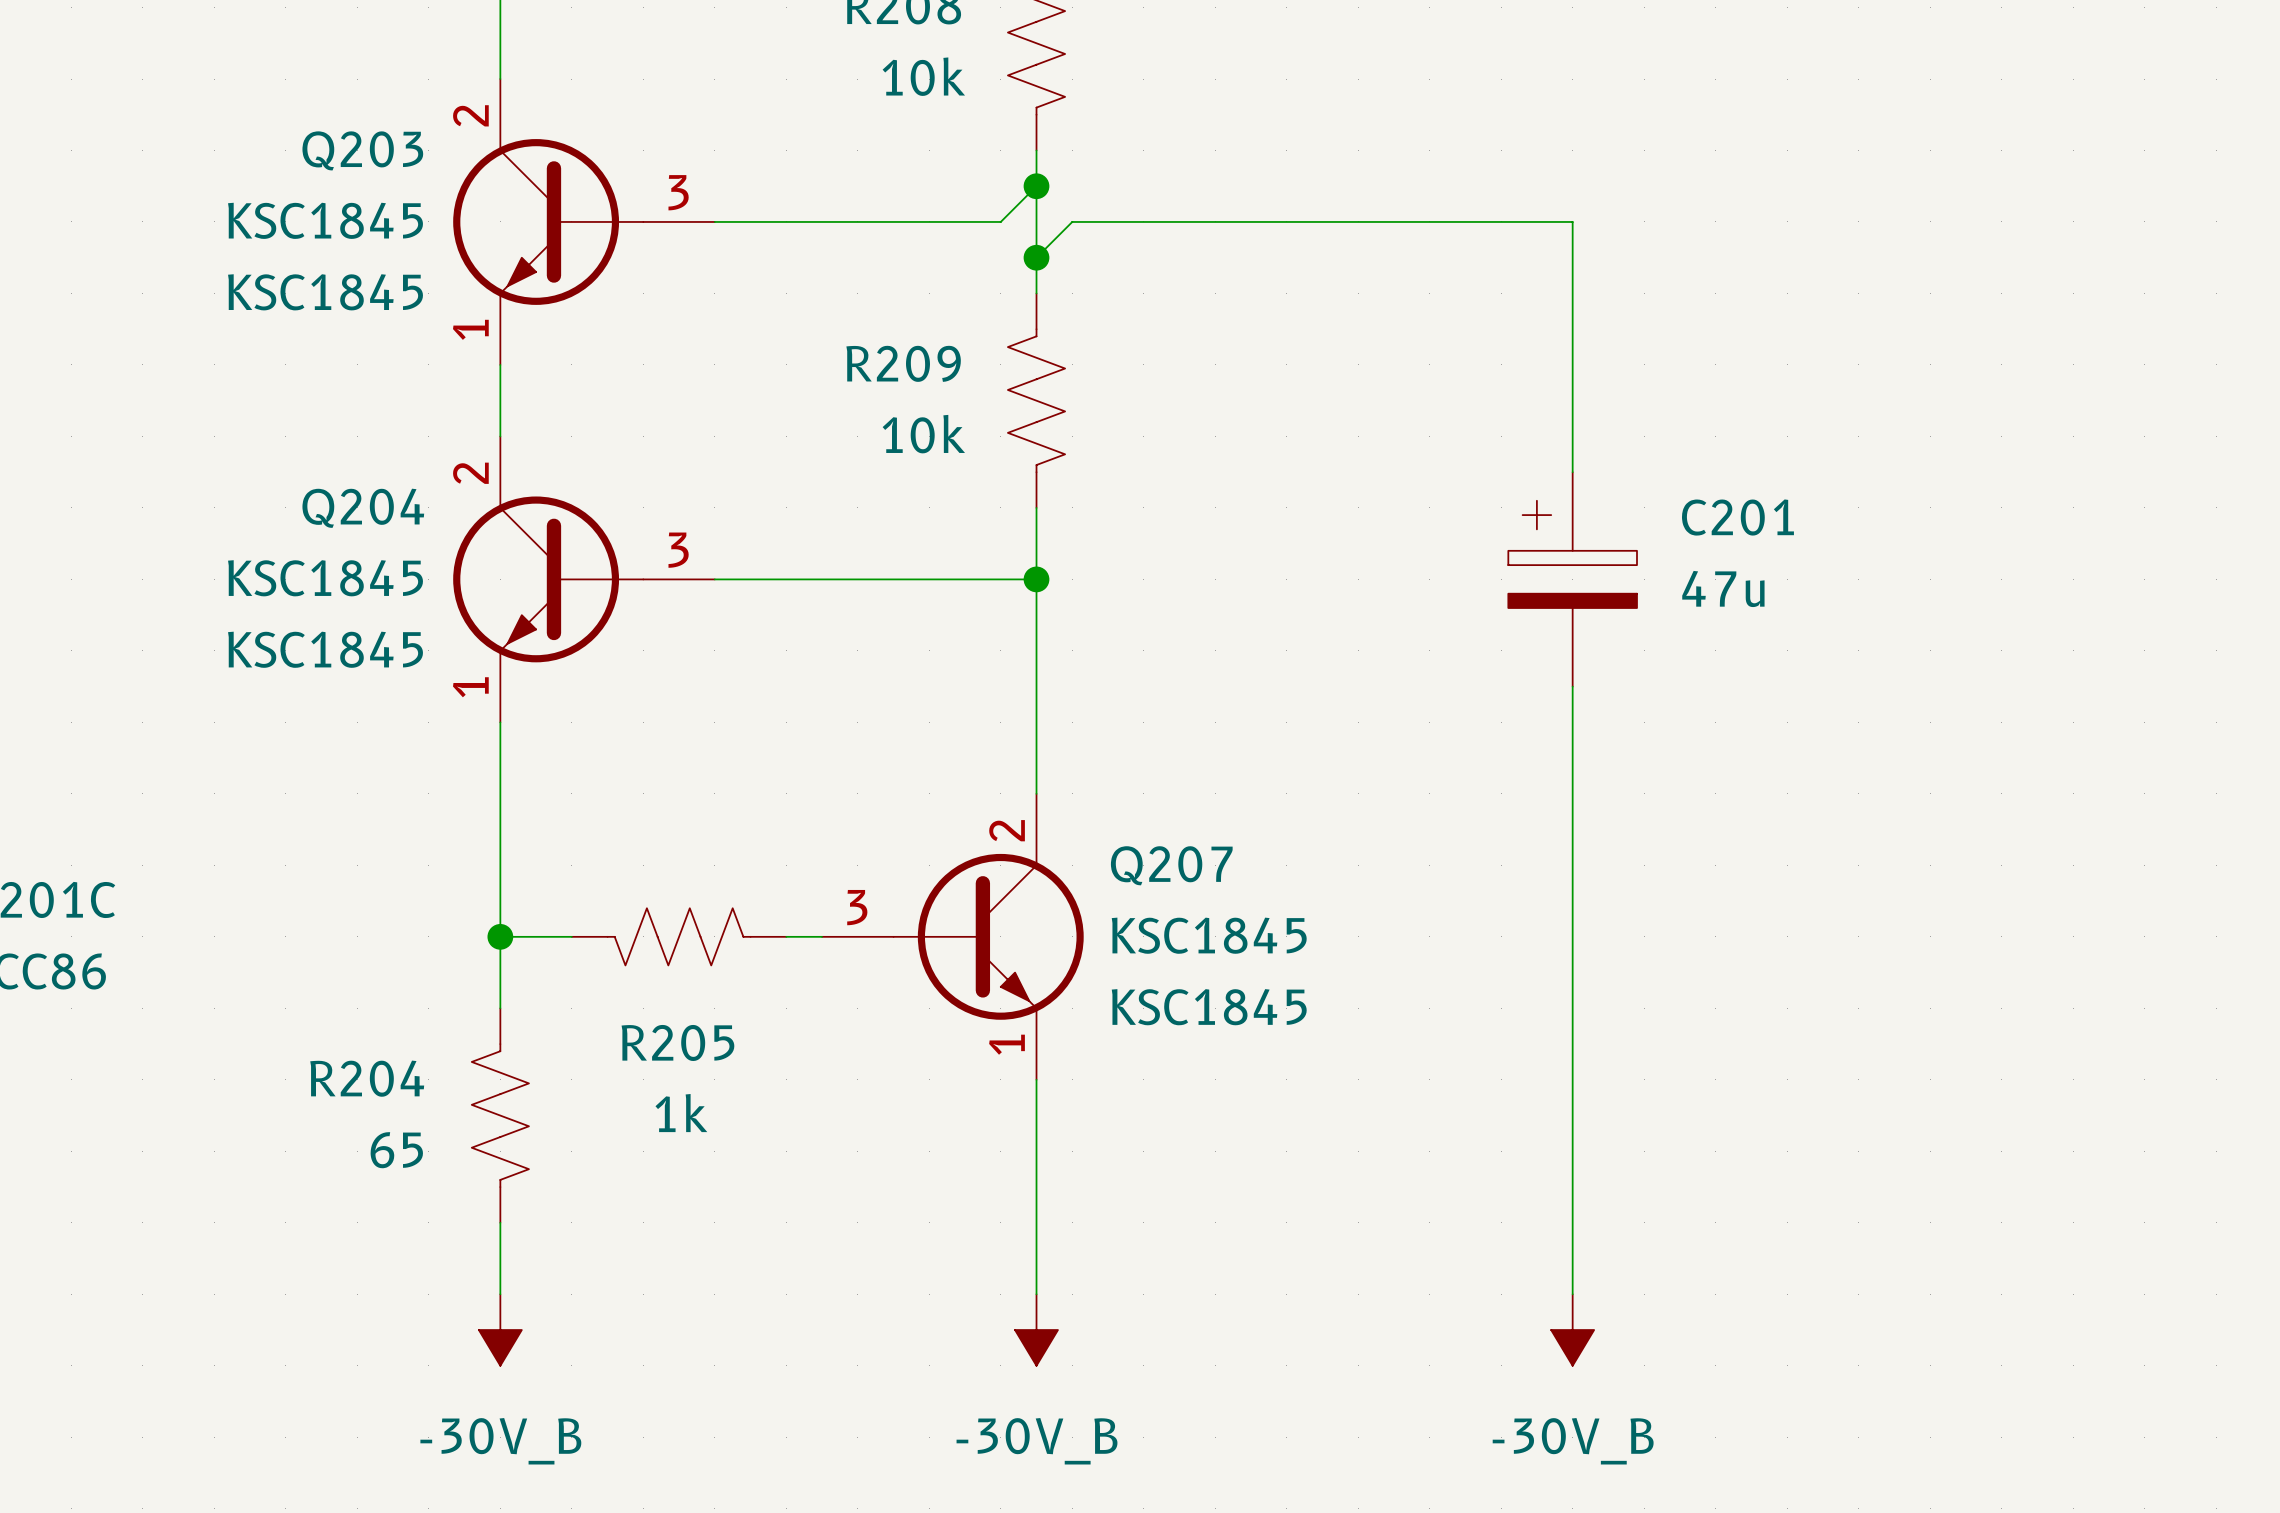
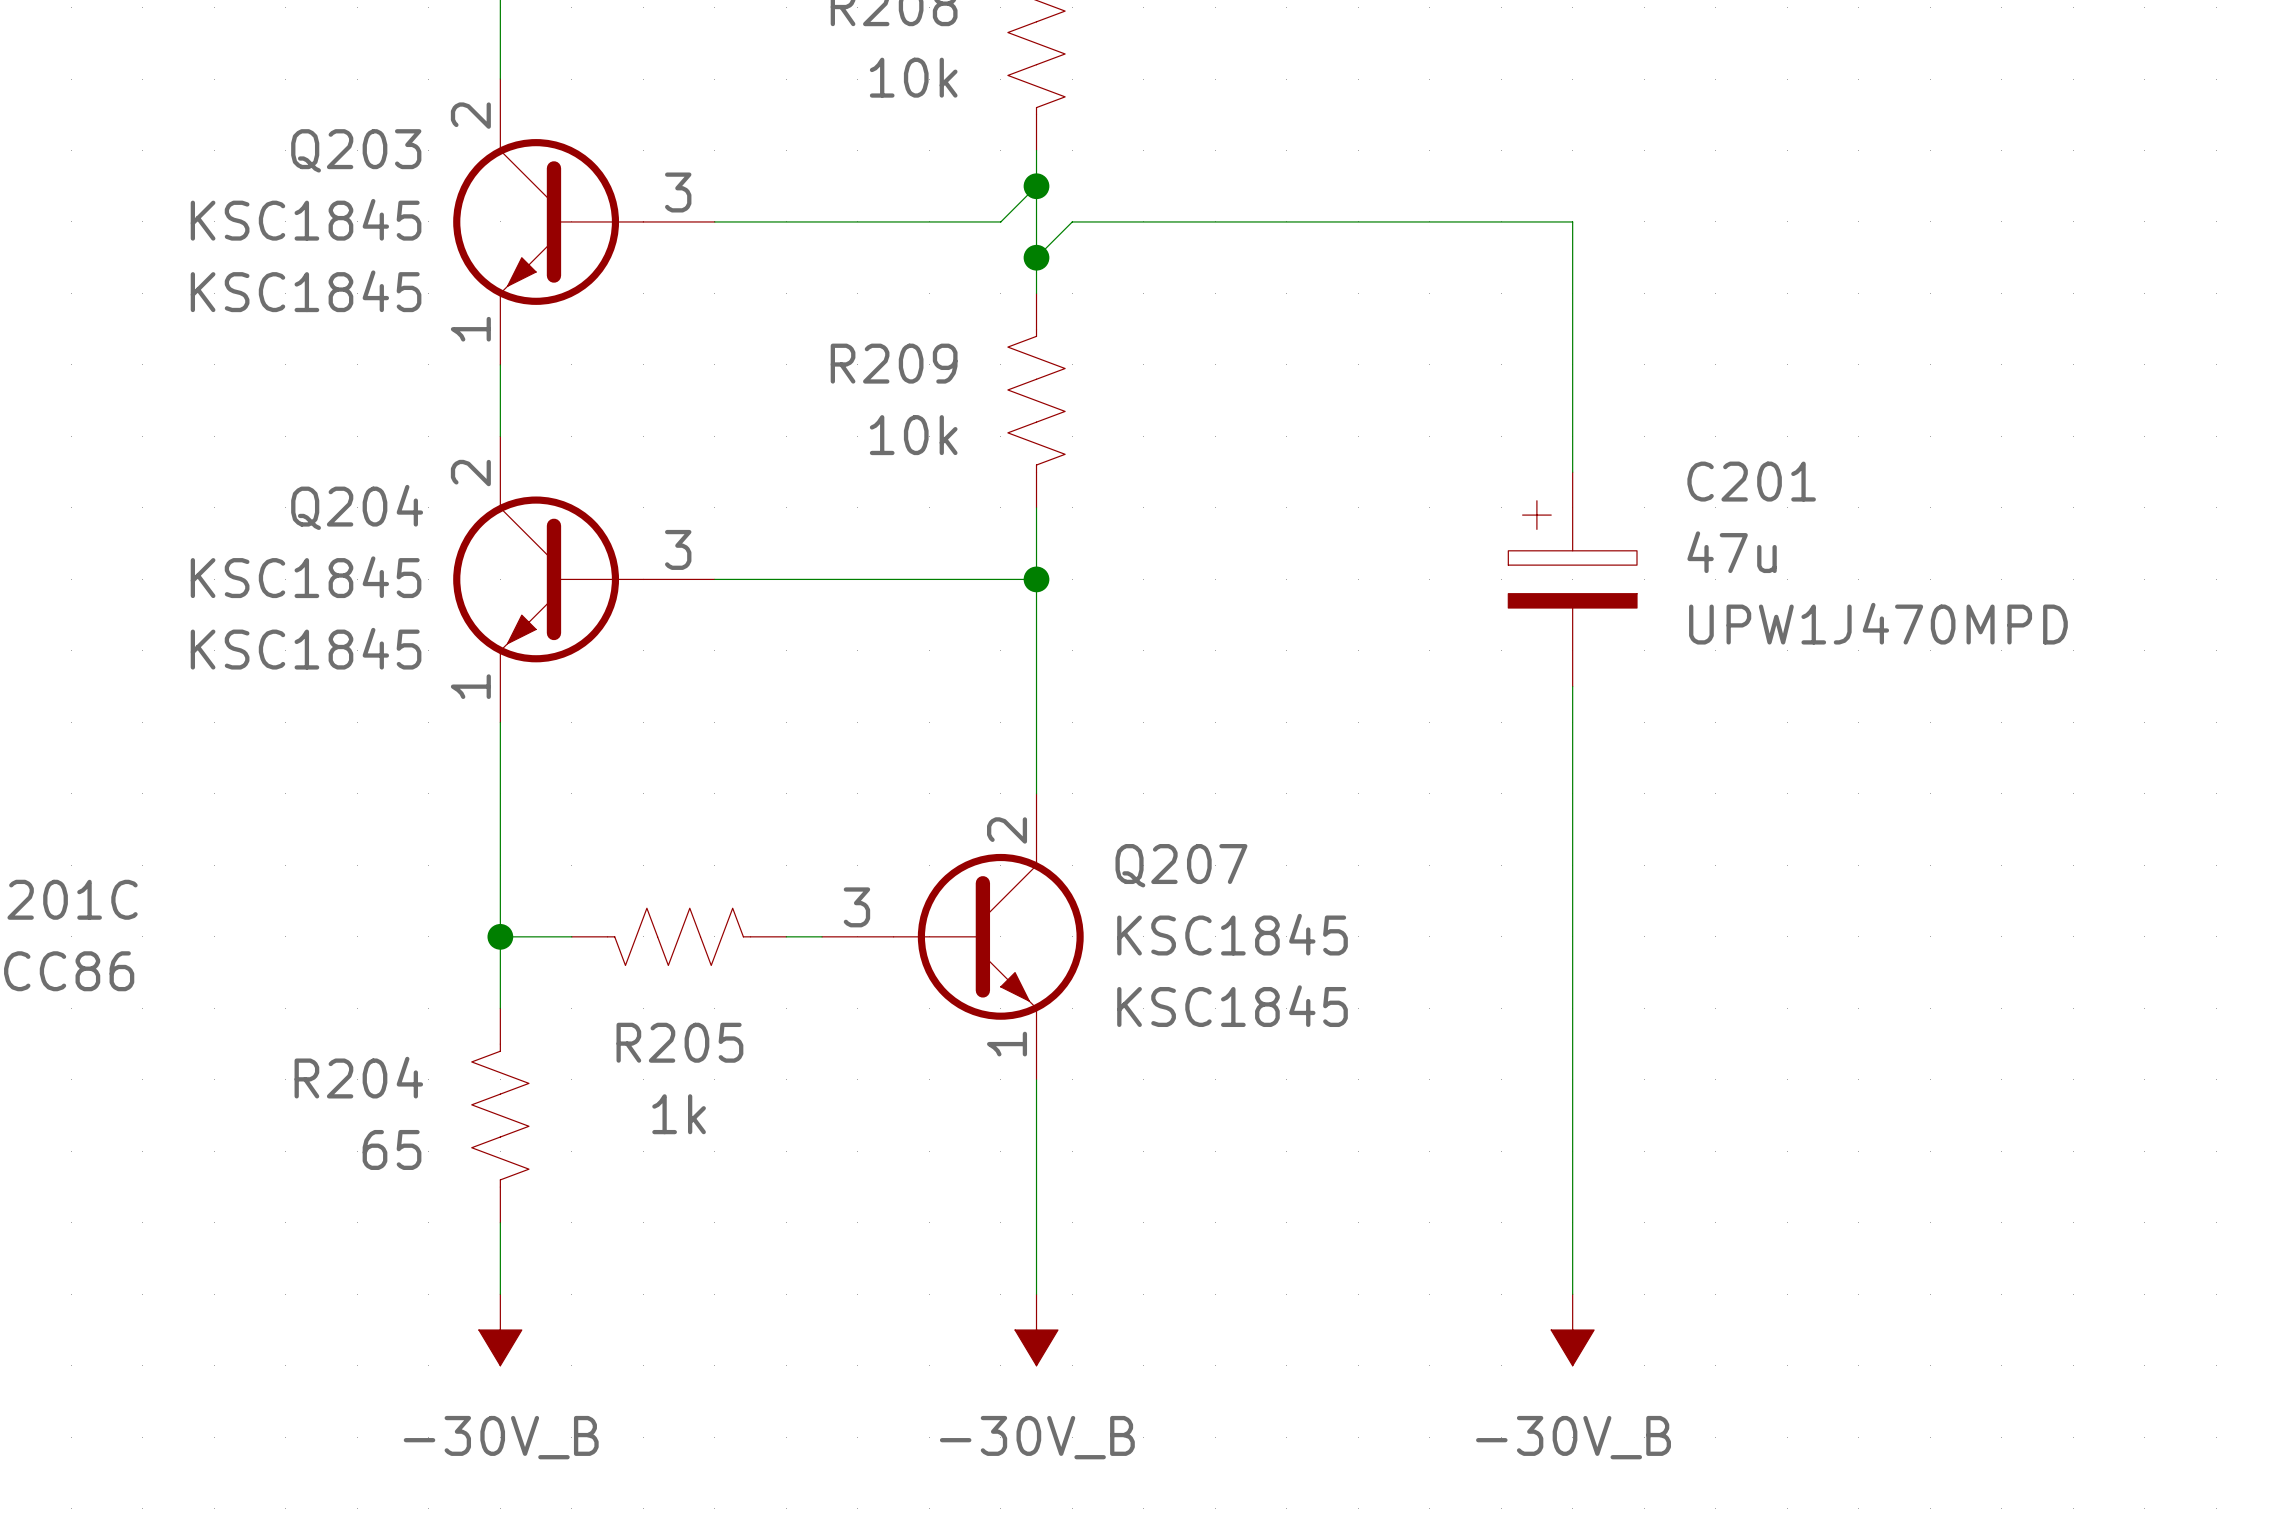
C201 name position: C201 (1737, 517) -> C201 (1751, 481)
C201 value position: 47u (1723, 588) -> 47u (1732, 552)
C201 text: none -> UPW1J470MPD (1878, 623)

